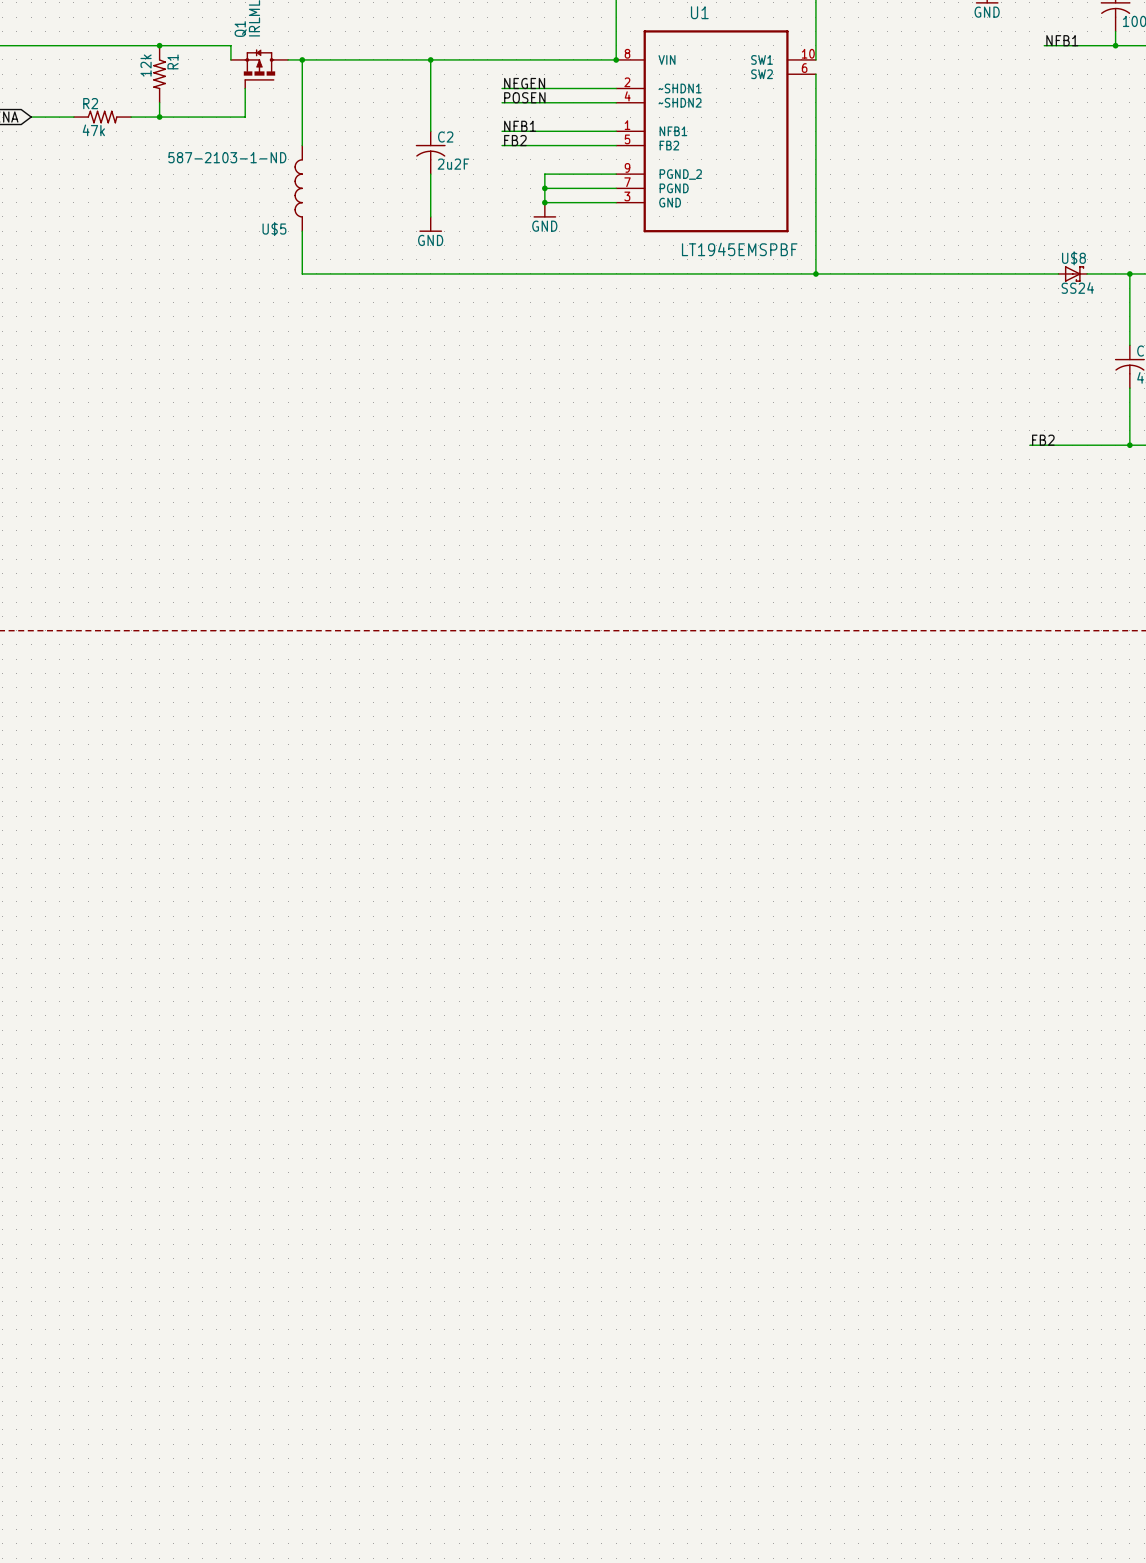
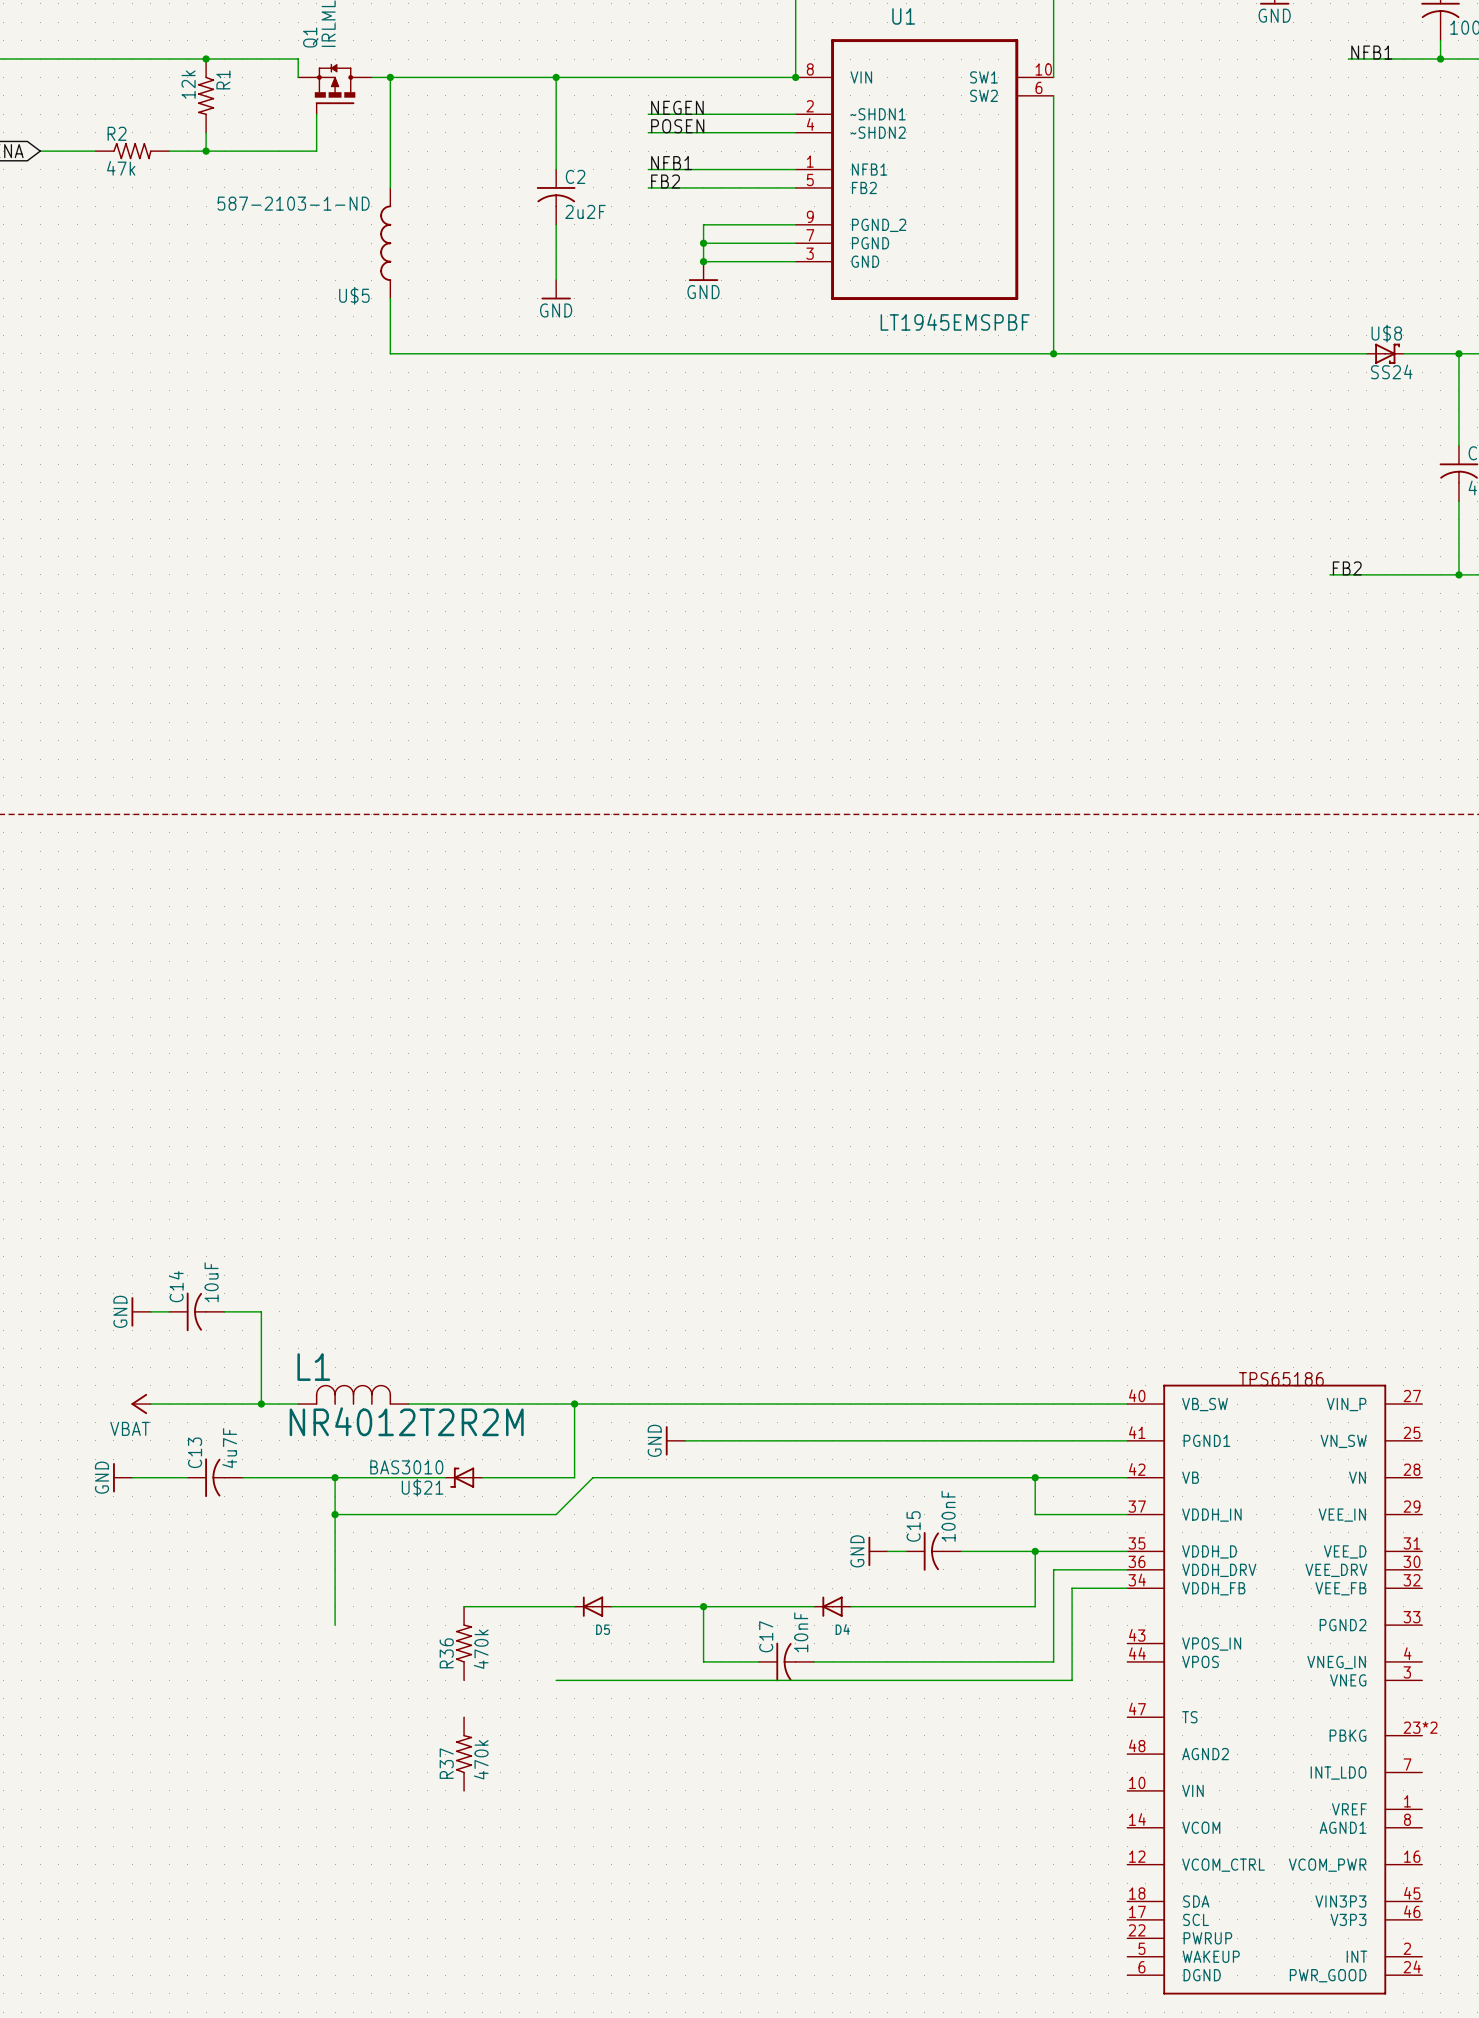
power symbol: none -> GND (141, 1311)
wire: none -> (150, 1311) (169, 1311)
C14: none -> 10uF (196, 1311)
wire: none -> (224, 1311) (261, 1311) (261, 1404)
L1: none -> NR4012T2R2M (353, 1394)
power symbol: none -> VBAT (141, 1404)
wire: none -> (150, 1404) (298, 1404)
junction: none -> (261, 1404)
wire: none -> (408, 1404) (1127, 1404)
wire: none -> (574, 1404) (574, 1477) (482, 1477)
junction: none -> (574, 1404)
power symbol: none -> GND (675, 1440)
wire: none -> (685, 1440) (1127, 1440)
power symbol: none -> GND (122, 1477)
wire: none -> (132, 1477) (187, 1477)
C13: none -> 4u7F (215, 1477)
wire: none -> (242, 1477) (445, 1477)
wire: none -> (335, 1477) (335, 1625)
junction: none -> (335, 1477)
U$21: none -> BAS3010 (464, 1477)
wire: none -> (1035, 1477) (1035, 1514) (1127, 1514)
junction: none -> (1035, 1477)
wire: none -> (1127, 1477) (593, 1477) (556, 1514) (335, 1514)
junction: none -> (335, 1514)
power symbol: none -> GND (878, 1551)
wire: none -> (887, 1551) (906, 1551)
C15: none -> 100nF (933, 1551)
wire: none -> (961, 1551) (1127, 1551)
wire: none -> (1035, 1551) (1035, 1606) (850, 1606)
junction: none -> (1035, 1551)
wire: none -> (1127, 1569) (1053, 1569) (1053, 1661) (814, 1661)
wire: none -> (1127, 1588) (1072, 1588) (1072, 1680) (556, 1680)
wire: none -> (464, 1606) (574, 1606)
D5: none -> (593, 1606)
wire: none -> (611, 1606) (814, 1606)
wire: none -> (703, 1606) (703, 1661) (758, 1661)
junction: none -> (703, 1606)
D4: none -> (832, 1606)
R36: none -> 470k (464, 1643)
C17: none -> 10nF (786, 1661)
part: none -> (1274, 1689)
R37: none -> 470k (464, 1754)

